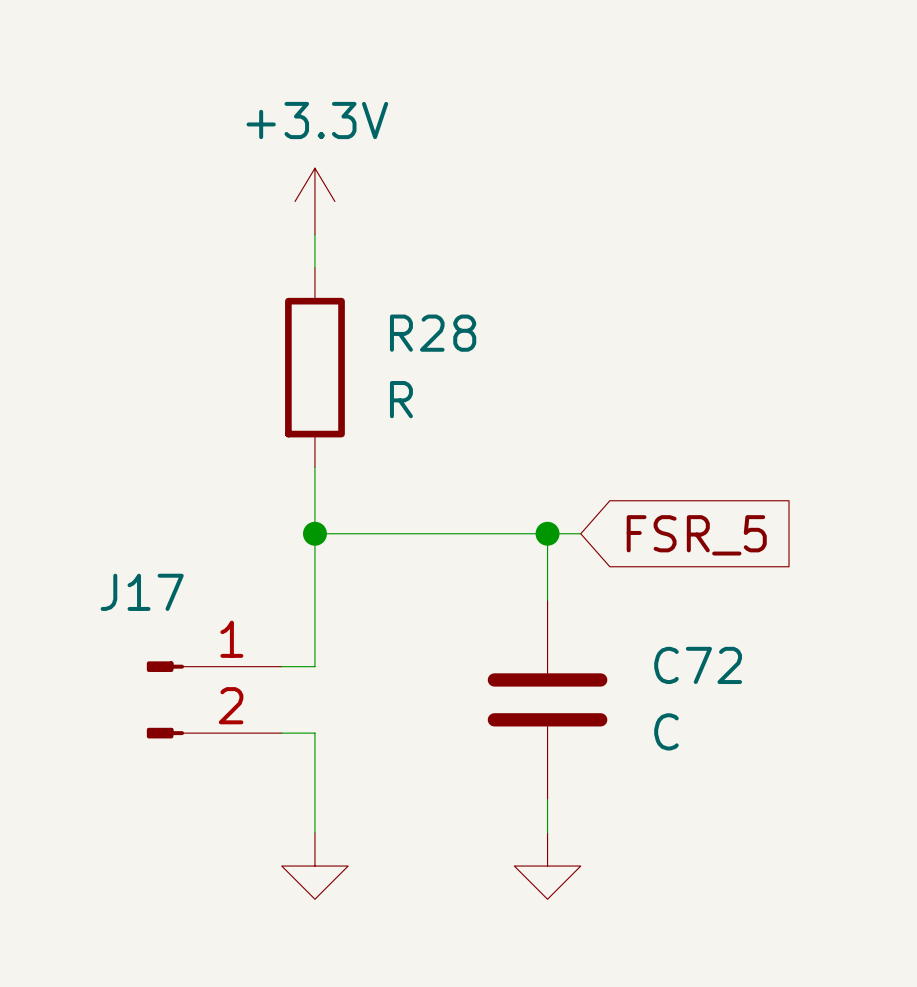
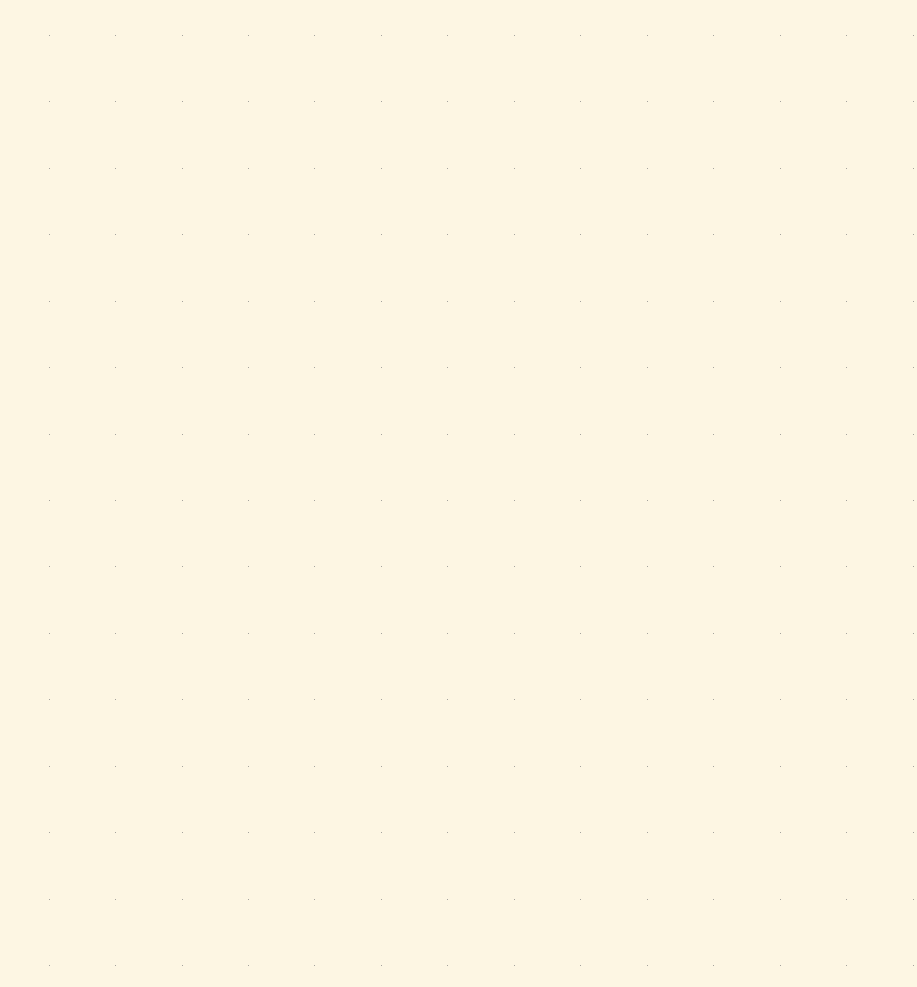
power symbol: +3.3V (314, 201) -> none
wire: (314, 234) (314, 267) -> none
R28: R (314, 367) -> none
wire: (314, 467) (314, 666) (281, 666) -> none
wire: (314, 533) (580, 533) -> none
junction: (314, 533) -> none
wire: (547, 533) (547, 600) -> none
junction: (547, 533) -> none
global label: FSR_5 (696, 535) -> none
J17: (214, 699) -> none
C72: C (547, 699) -> none
wire: (281, 733) (314, 733) (314, 832) -> none
wire: (547, 799) (547, 832) -> none
power symbol: (314, 866) -> none
power symbol: (547, 866) -> none

